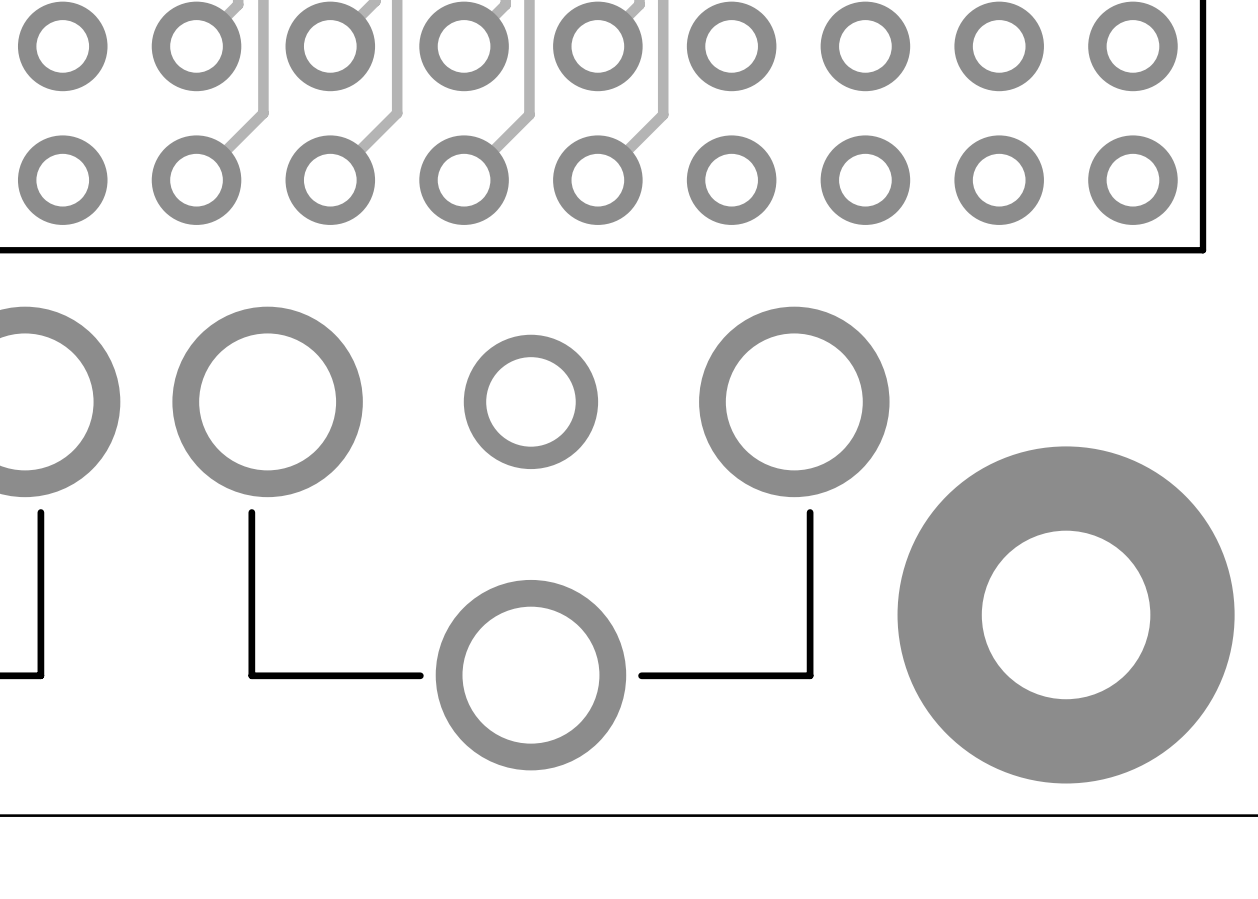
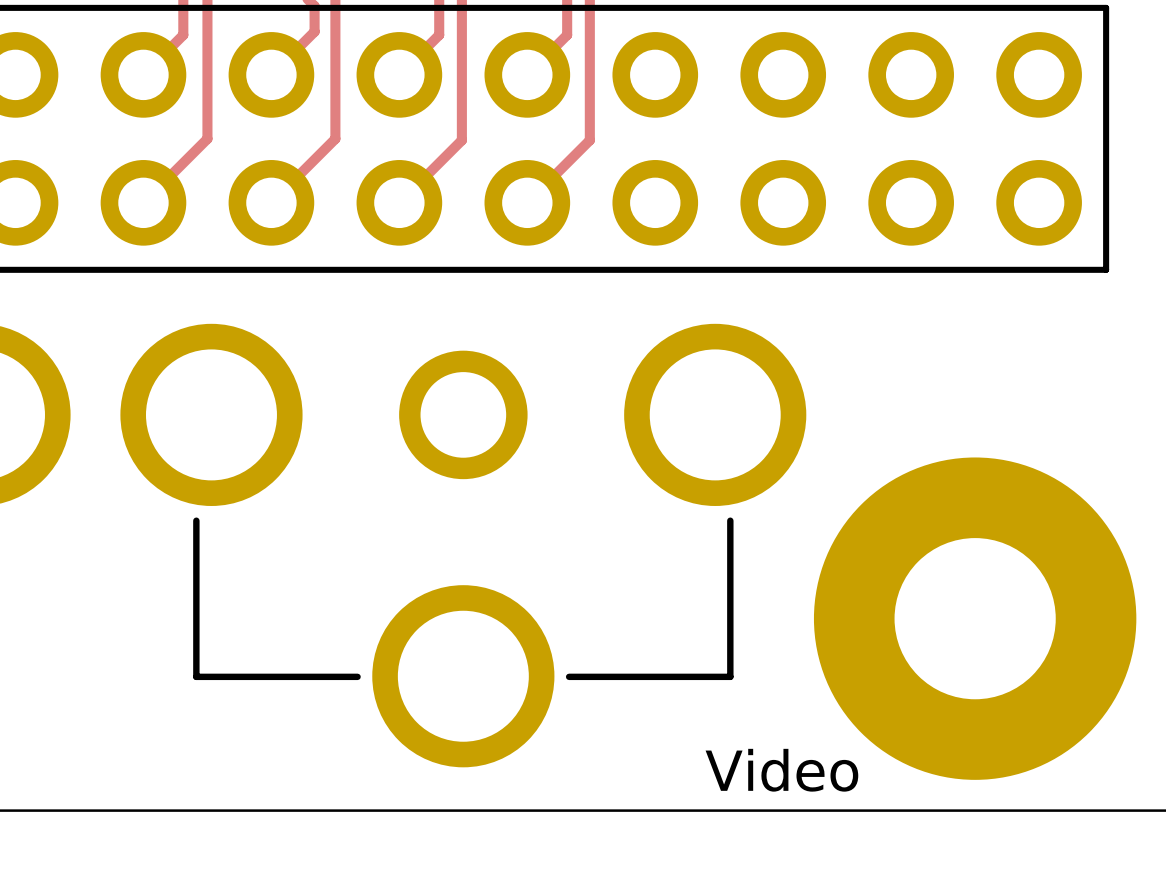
text: none -> Video (781, 770)

